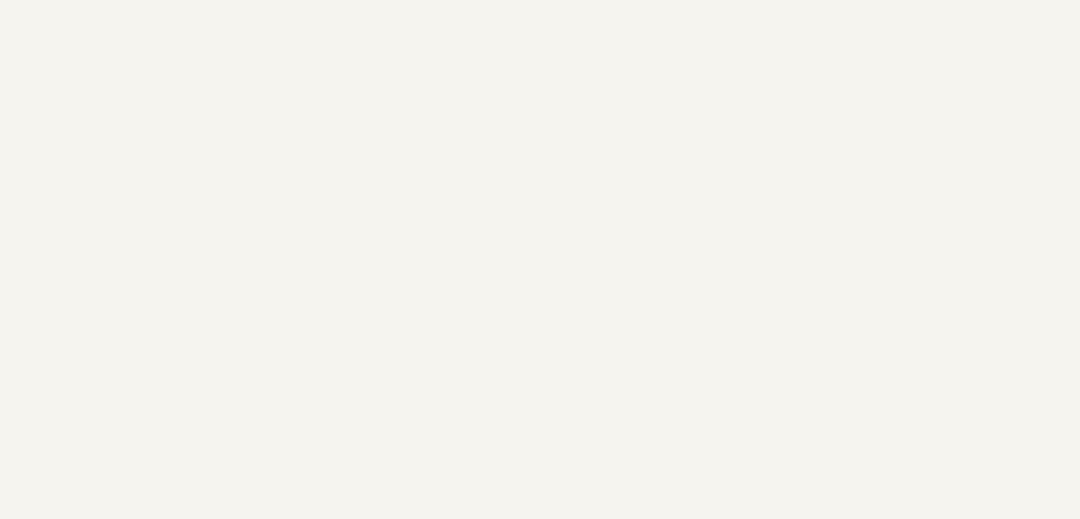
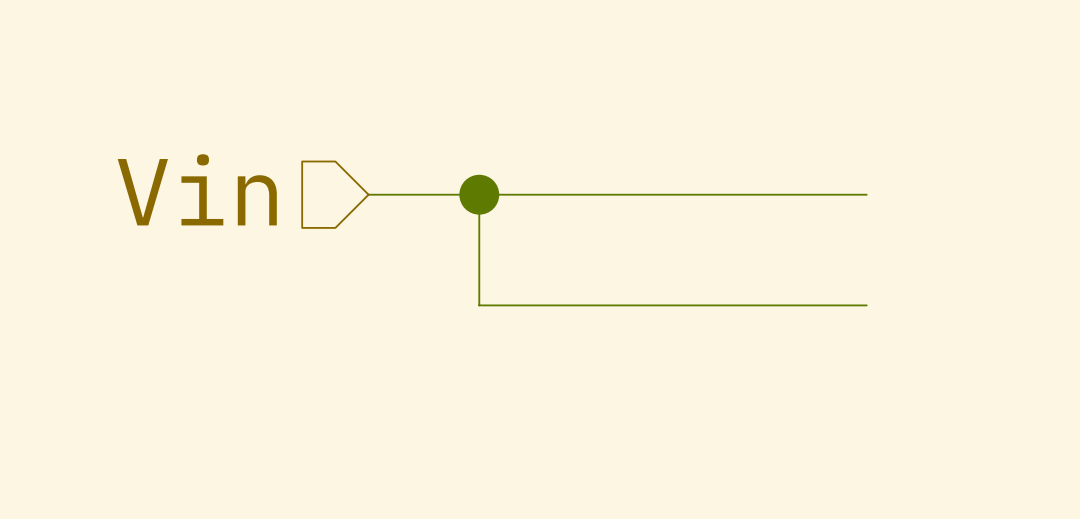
hierarchical label: none -> Vin (197, 189)
wire: none -> (368, 194) (866, 194)
wire: none -> (479, 194) (479, 305) (866, 305)
junction: none -> (479, 194)

